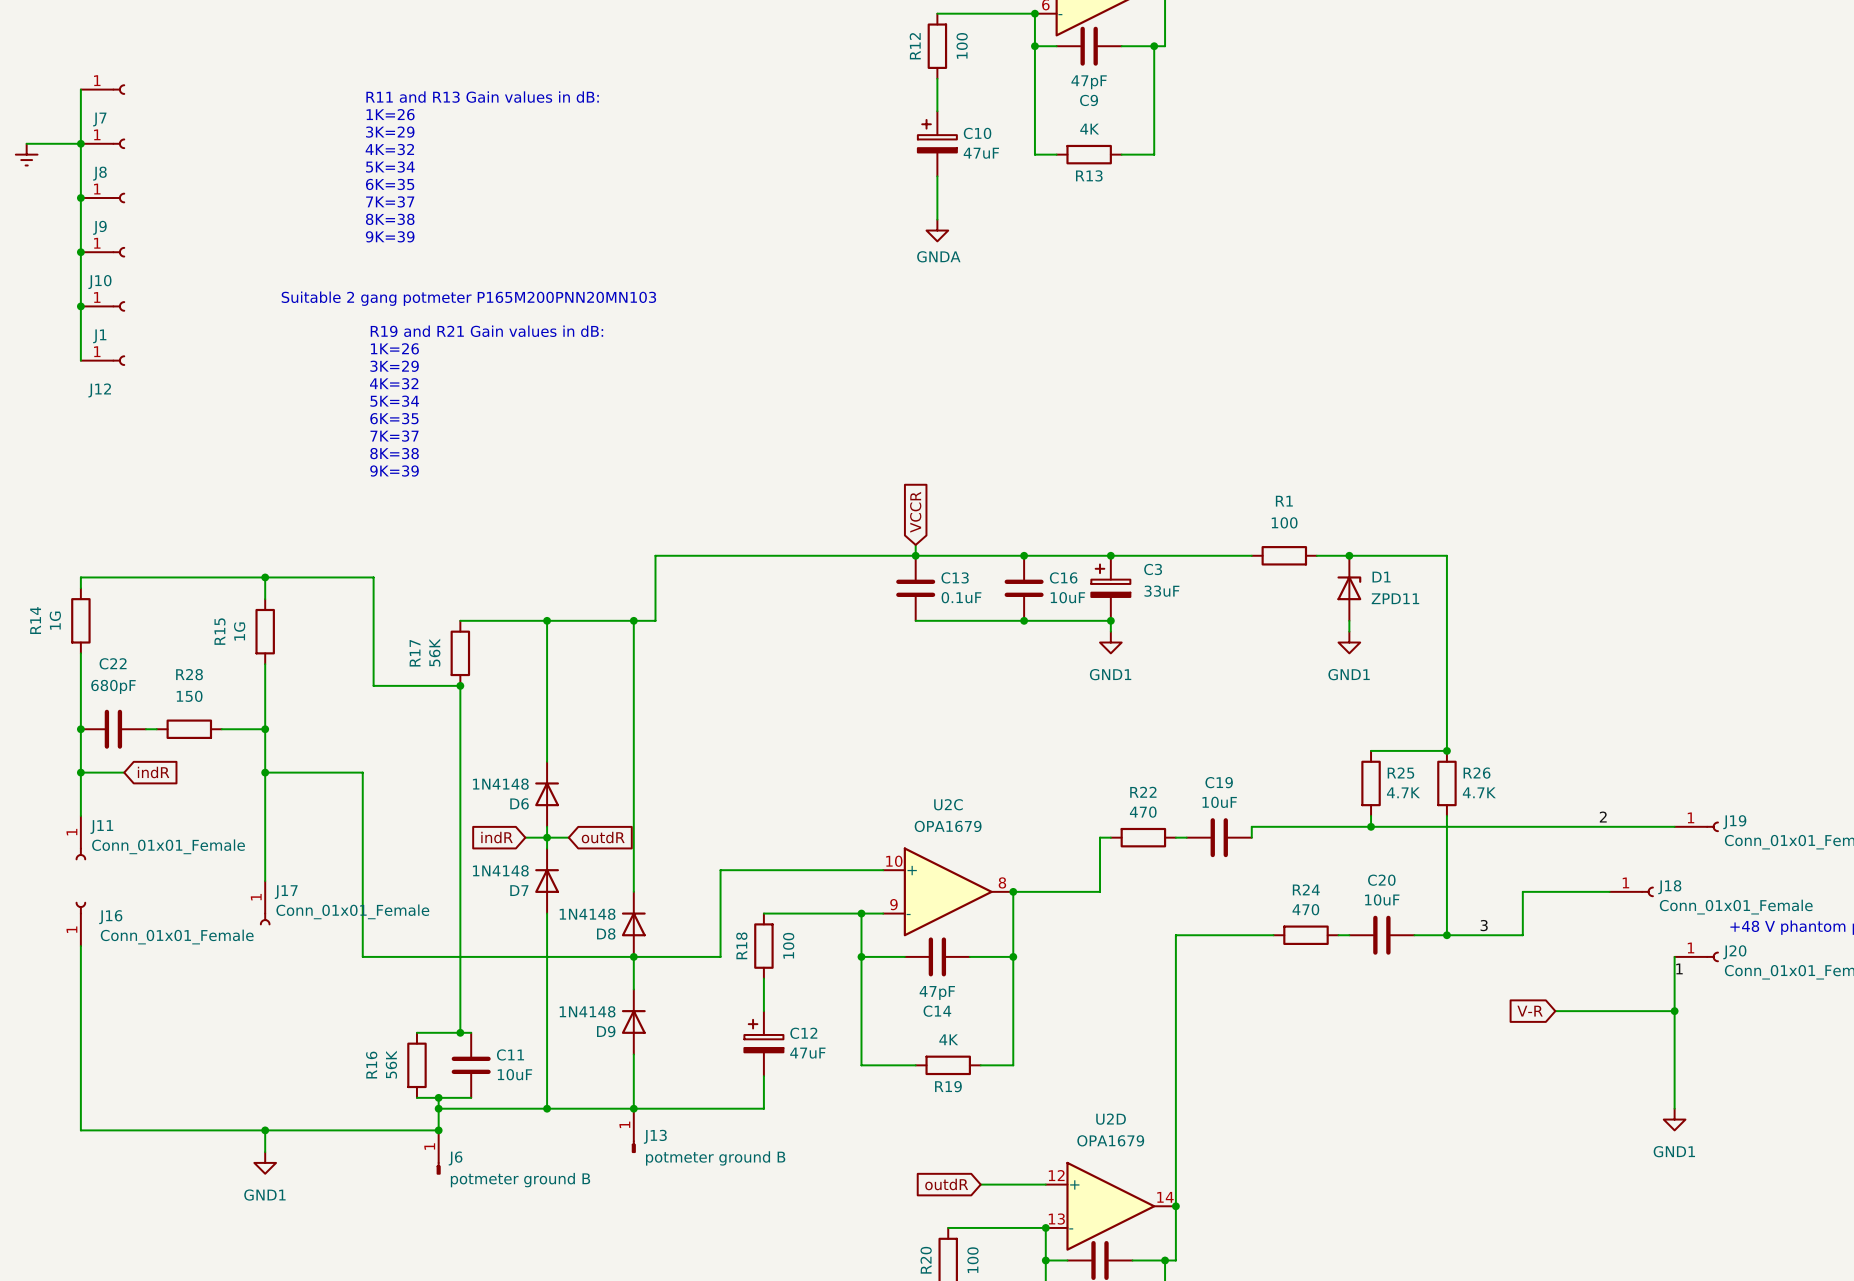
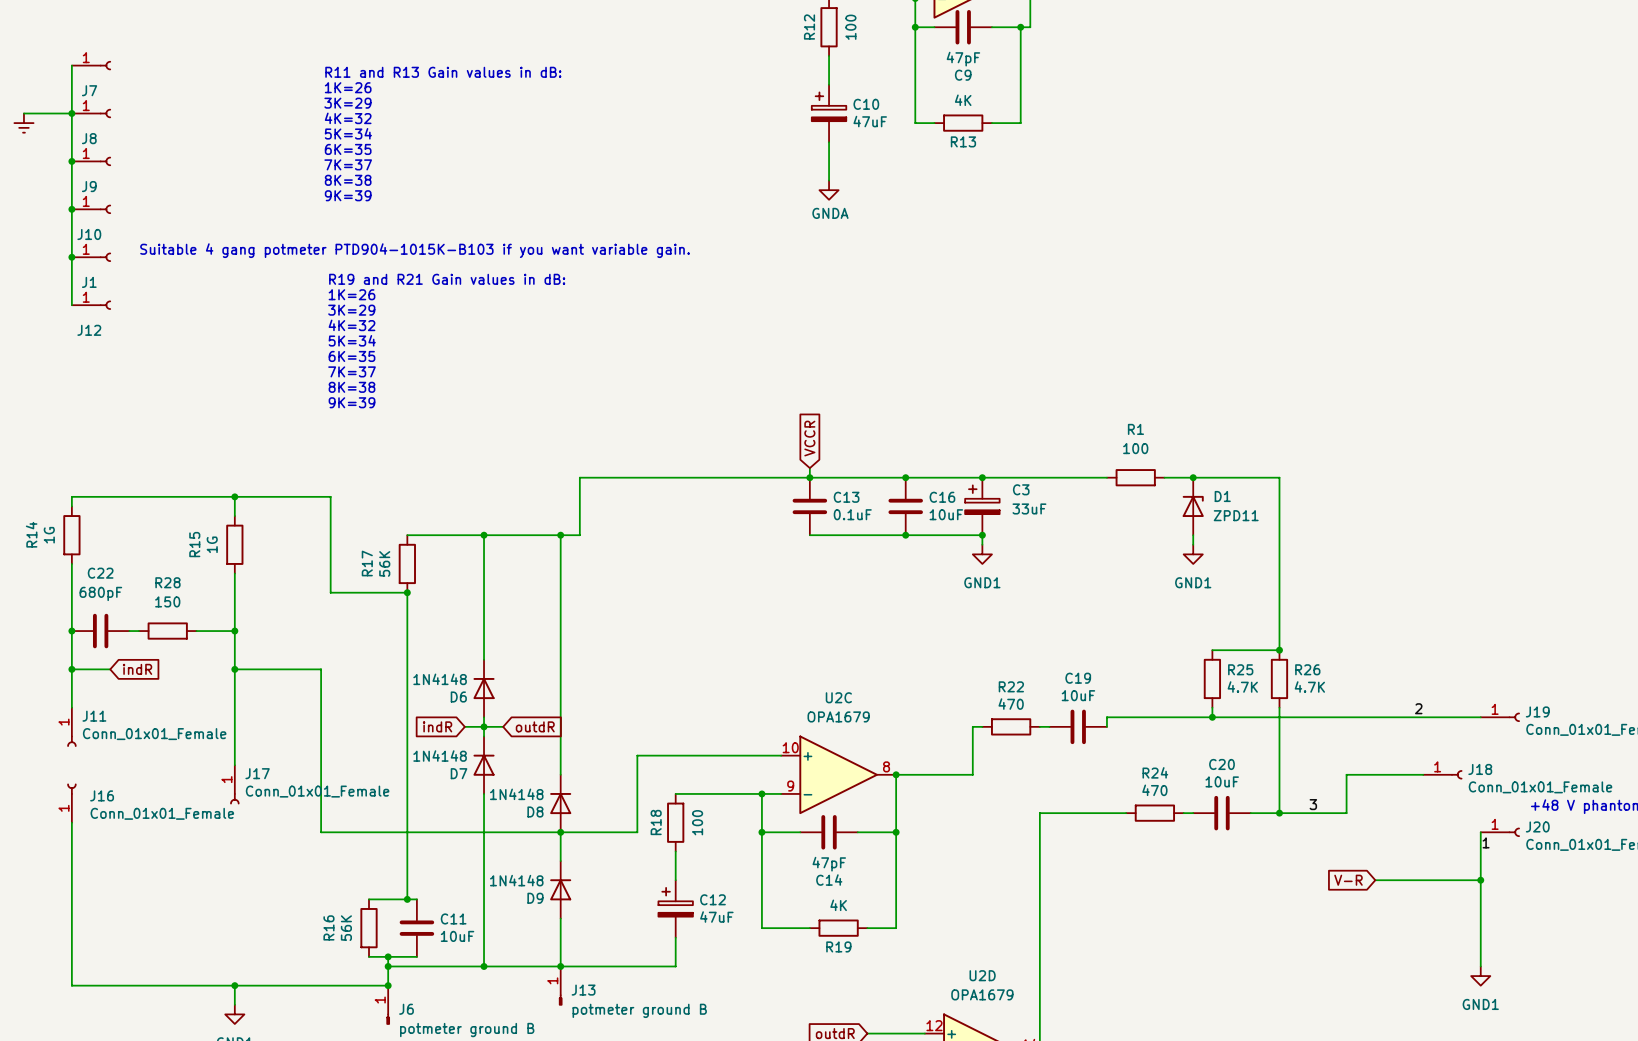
text: Suitable 2 gang potmeter P165M200PNN20MN103 (468, 298) -> Suitable 4 gang potmeter PTD904-1015K-B103 if you want variable gain. (415, 250)

